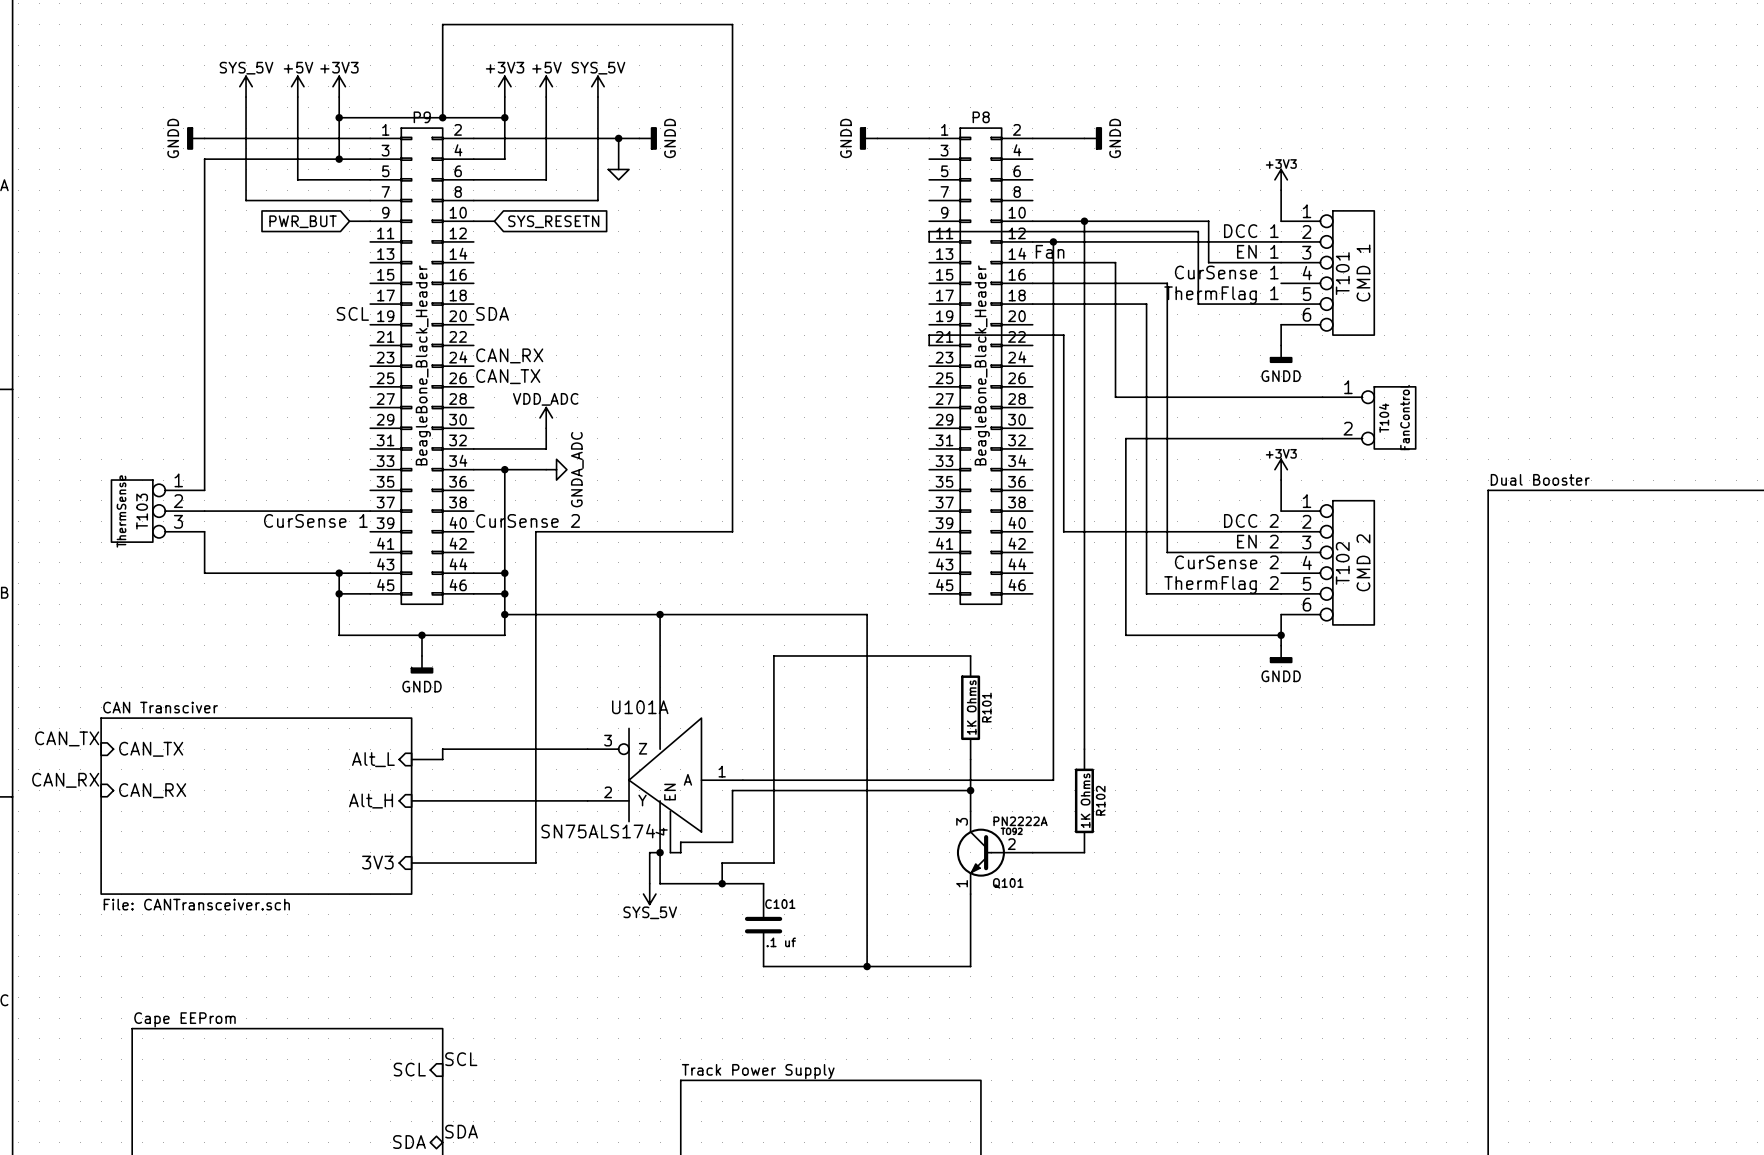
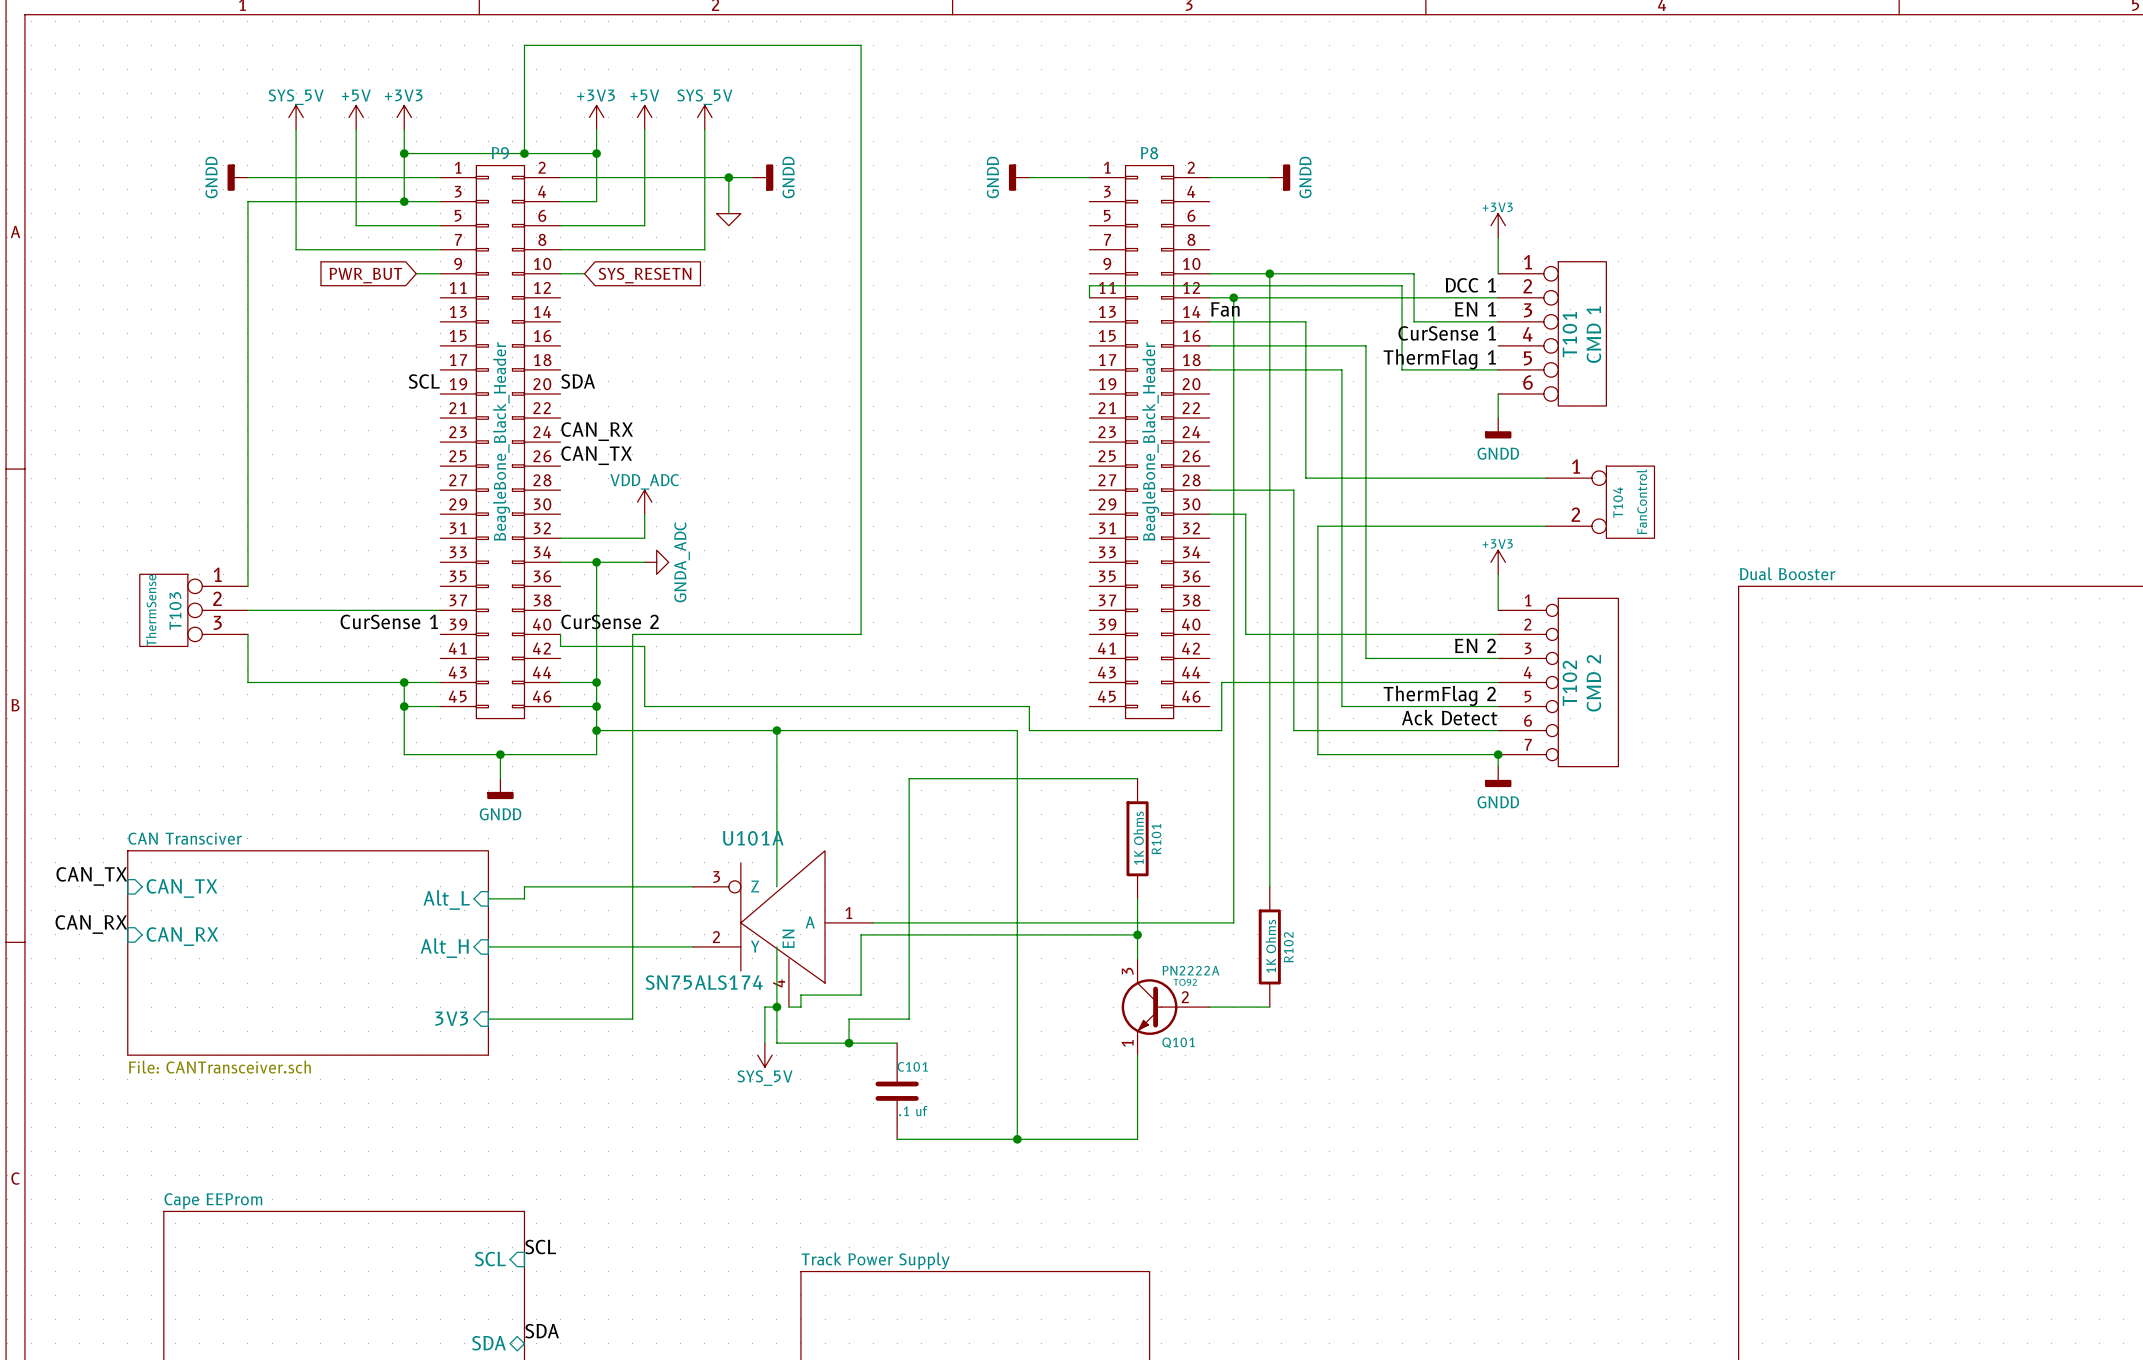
wire: (929, 345) (929, 335) (1063, 335) (1063, 428) -> (1209, 514) (1245, 514)
T102 symbol: [1281, 500, 1375, 625] -> [1498, 598, 1619, 767]
label: DCC 2 (1251, 520) -> none
wire: none -> (560, 634) (560, 646) (644, 646) (644, 706) (1029, 706) (1029, 730) (1221, 730) (1221, 682) (1498, 682)
label: CurSense 2 (1226, 562) -> none
label: none -> Ack Detect (1449, 717)
wire: (1281, 614) (1281, 635) -> (1498, 730) (1293, 730) (1293, 490) (1209, 490)

